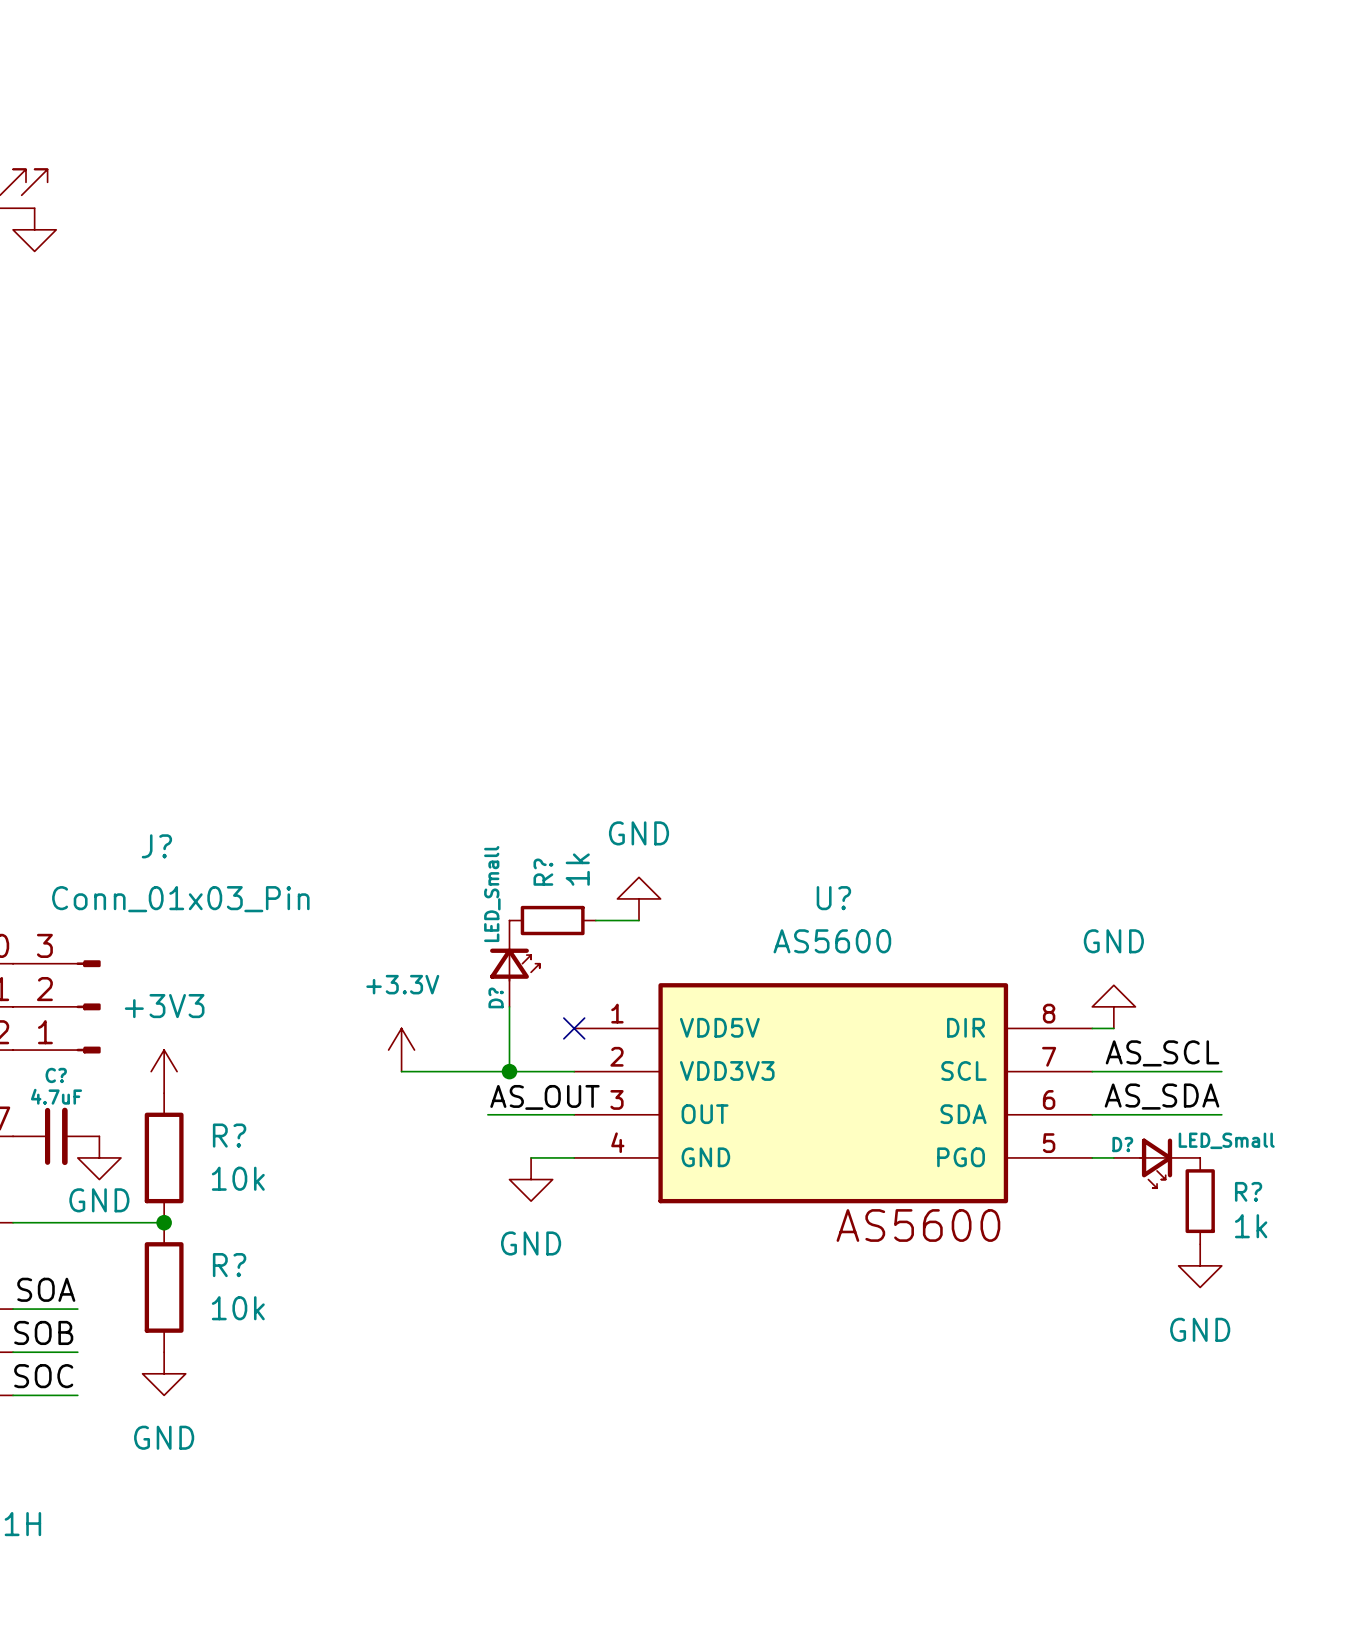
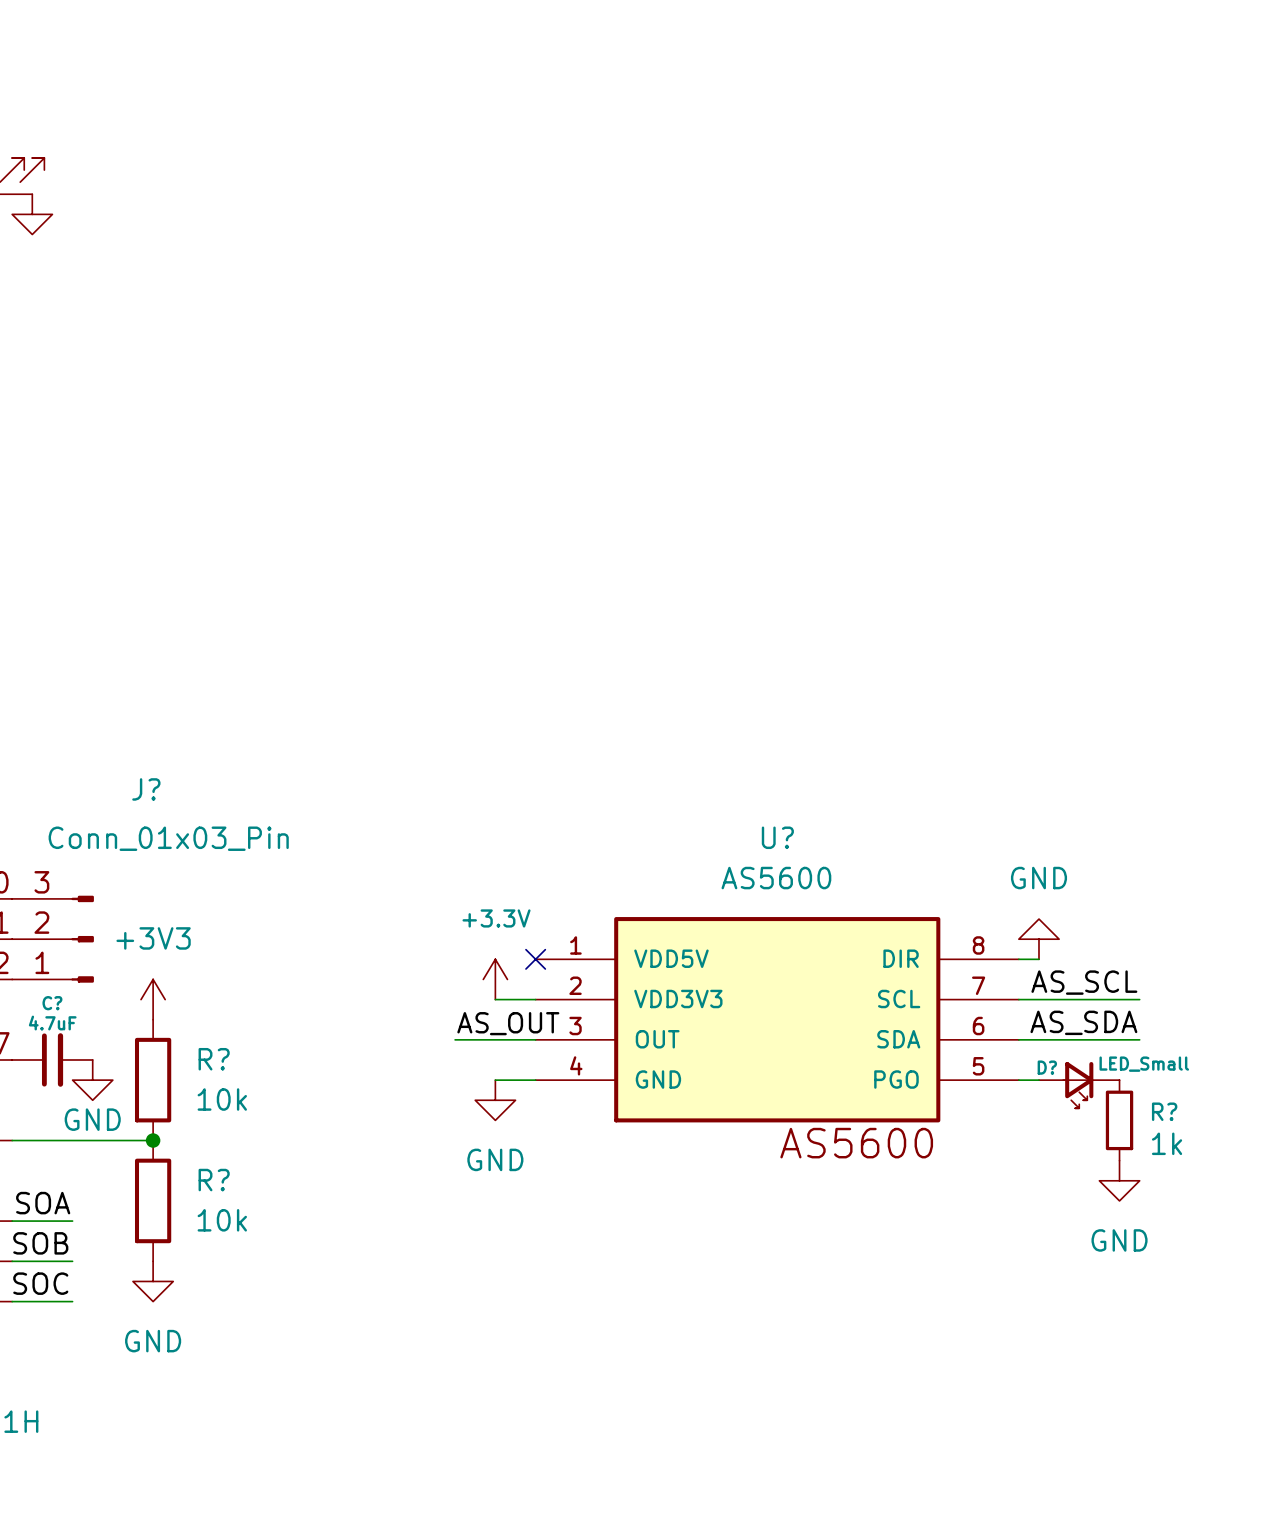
power symbol: GND (639, 898) -> none
R?: 1k (552, 920) -> none
wire: (595, 920) (639, 920) -> none
D?: LED_Small (514, 963) -> none
wire: (509, 1006) (509, 1071) -> none
power symbol position: +3.3V (401, 1050) -> +3.3V (495, 979)
wire: (401, 1071) (531, 1071) -> none
junction: (509, 1071) -> none

